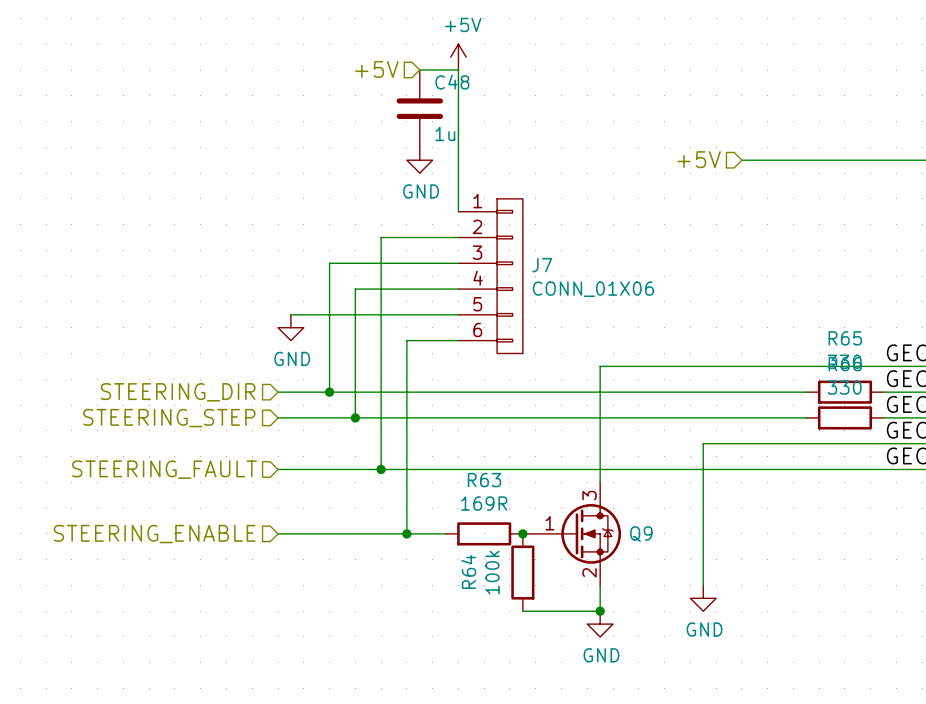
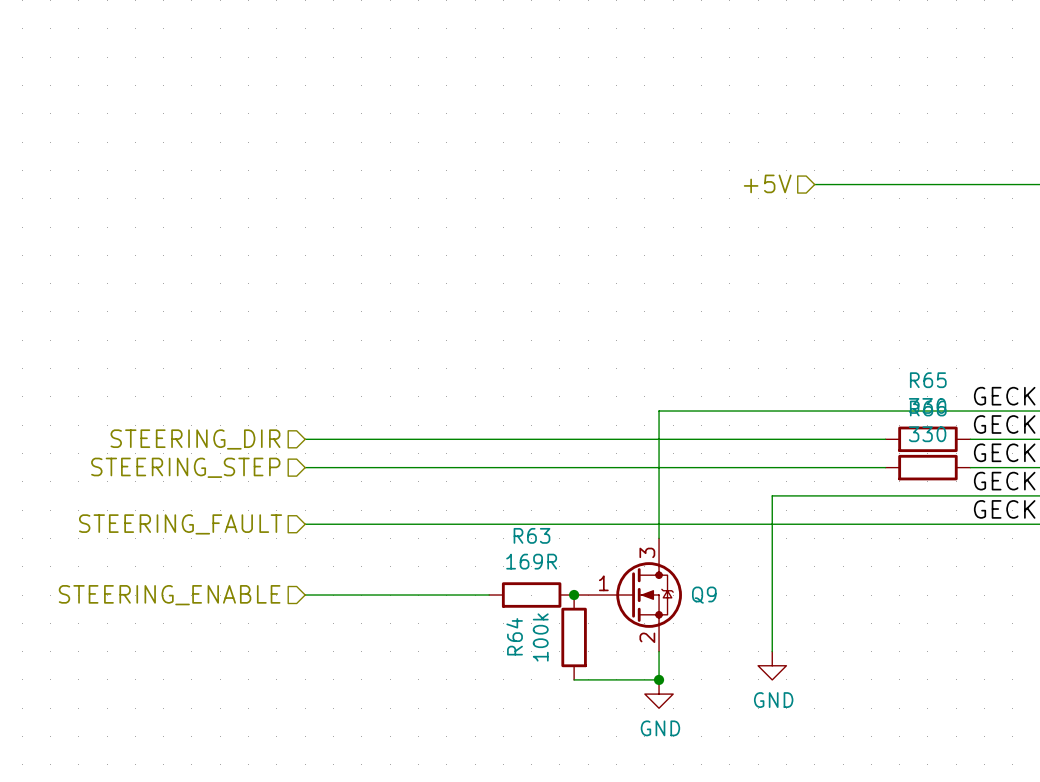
power symbol: +5V (458, 57) -> none
hierarchical label: +5V (376, 69) -> none
wire: (419, 70) (458, 70) (458, 211) -> none
C48: 1u (419, 108) -> none
power symbol: GND (419, 160) -> none
wire: (458, 237) (381, 237) (381, 469) -> none
wire: (458, 263) (329, 263) (329, 392) -> none
J7: CONN_01X06 (490, 276) -> none
wire: (458, 289) (355, 289) (355, 417) -> none
wire: (290, 314) (458, 314) -> none
power symbol: GND (290, 327) -> none
wire: (458, 340) (406, 340) (406, 533) -> none
junction: (329, 392) -> none
junction: (355, 417) -> none
junction: (381, 469) -> none
junction: (406, 533) -> none

